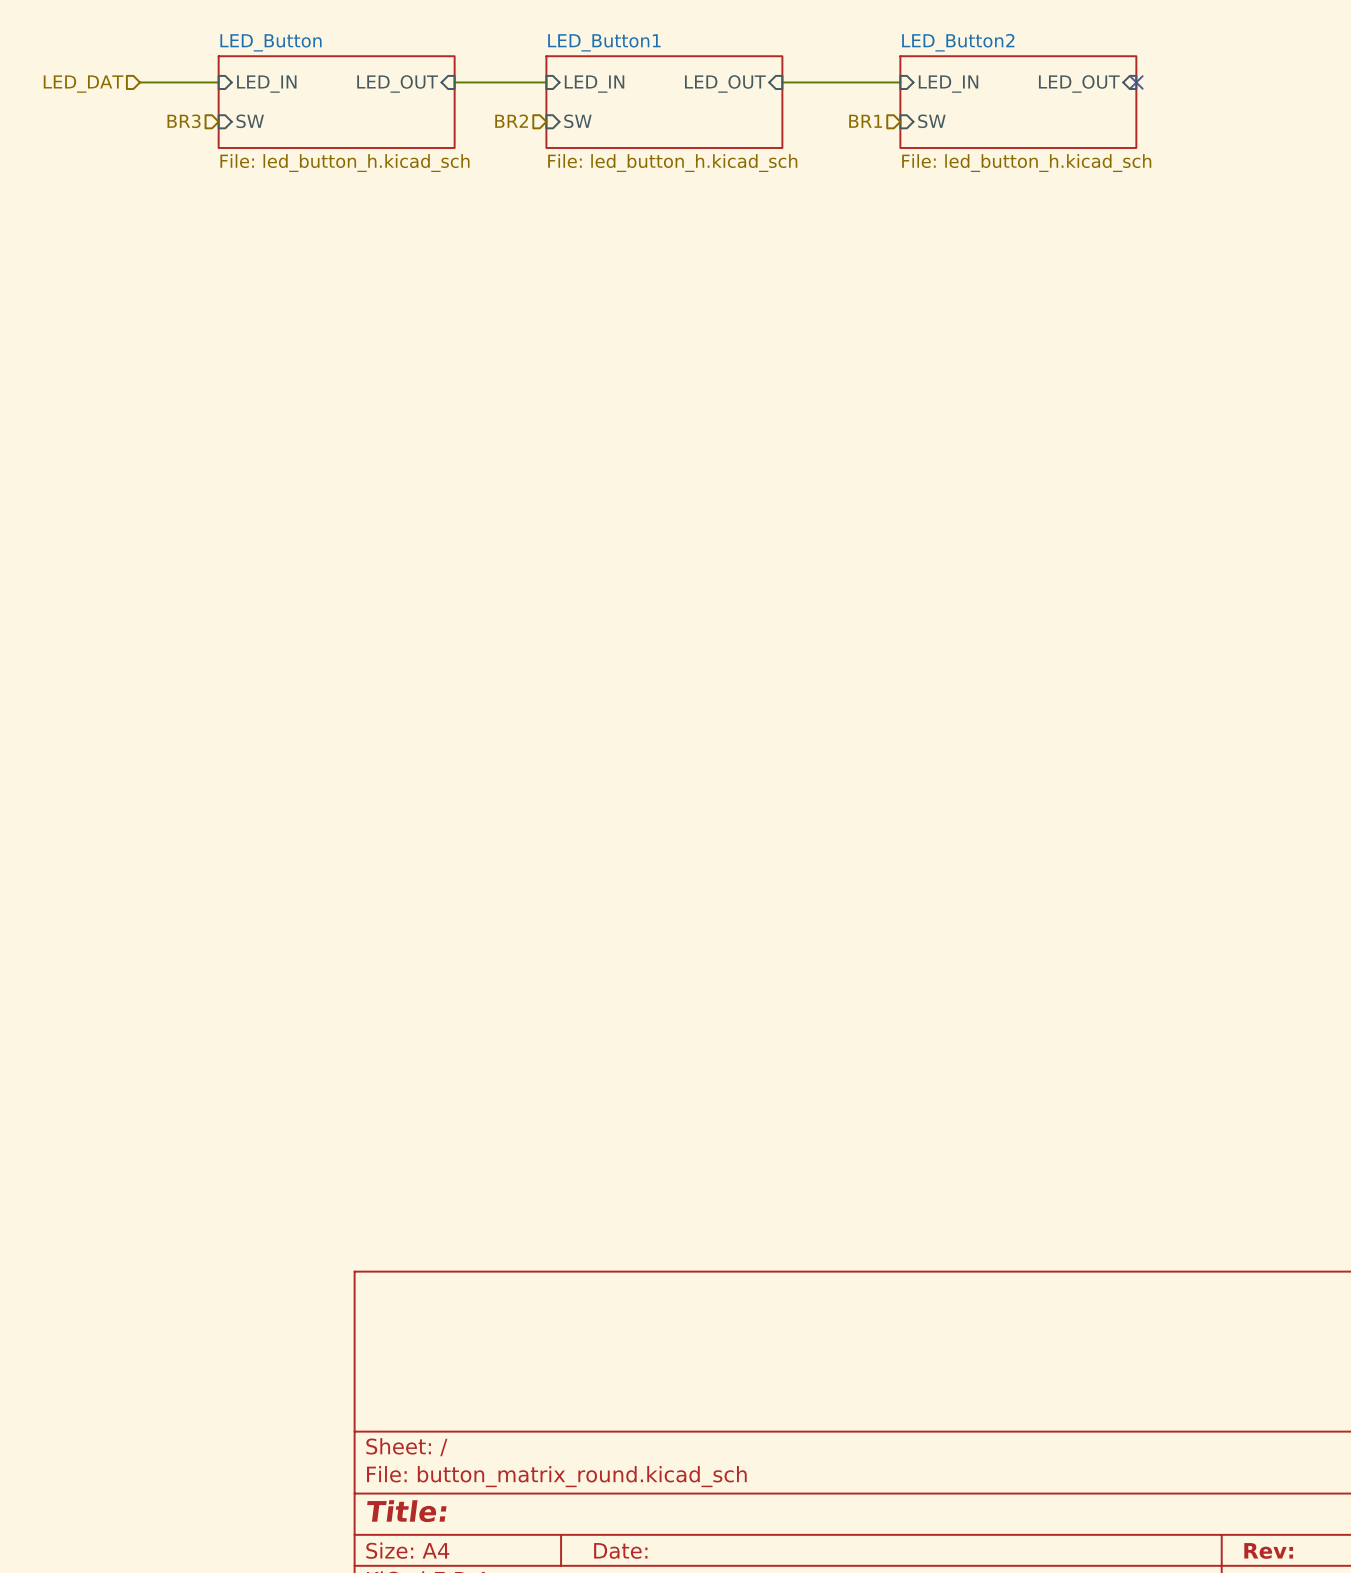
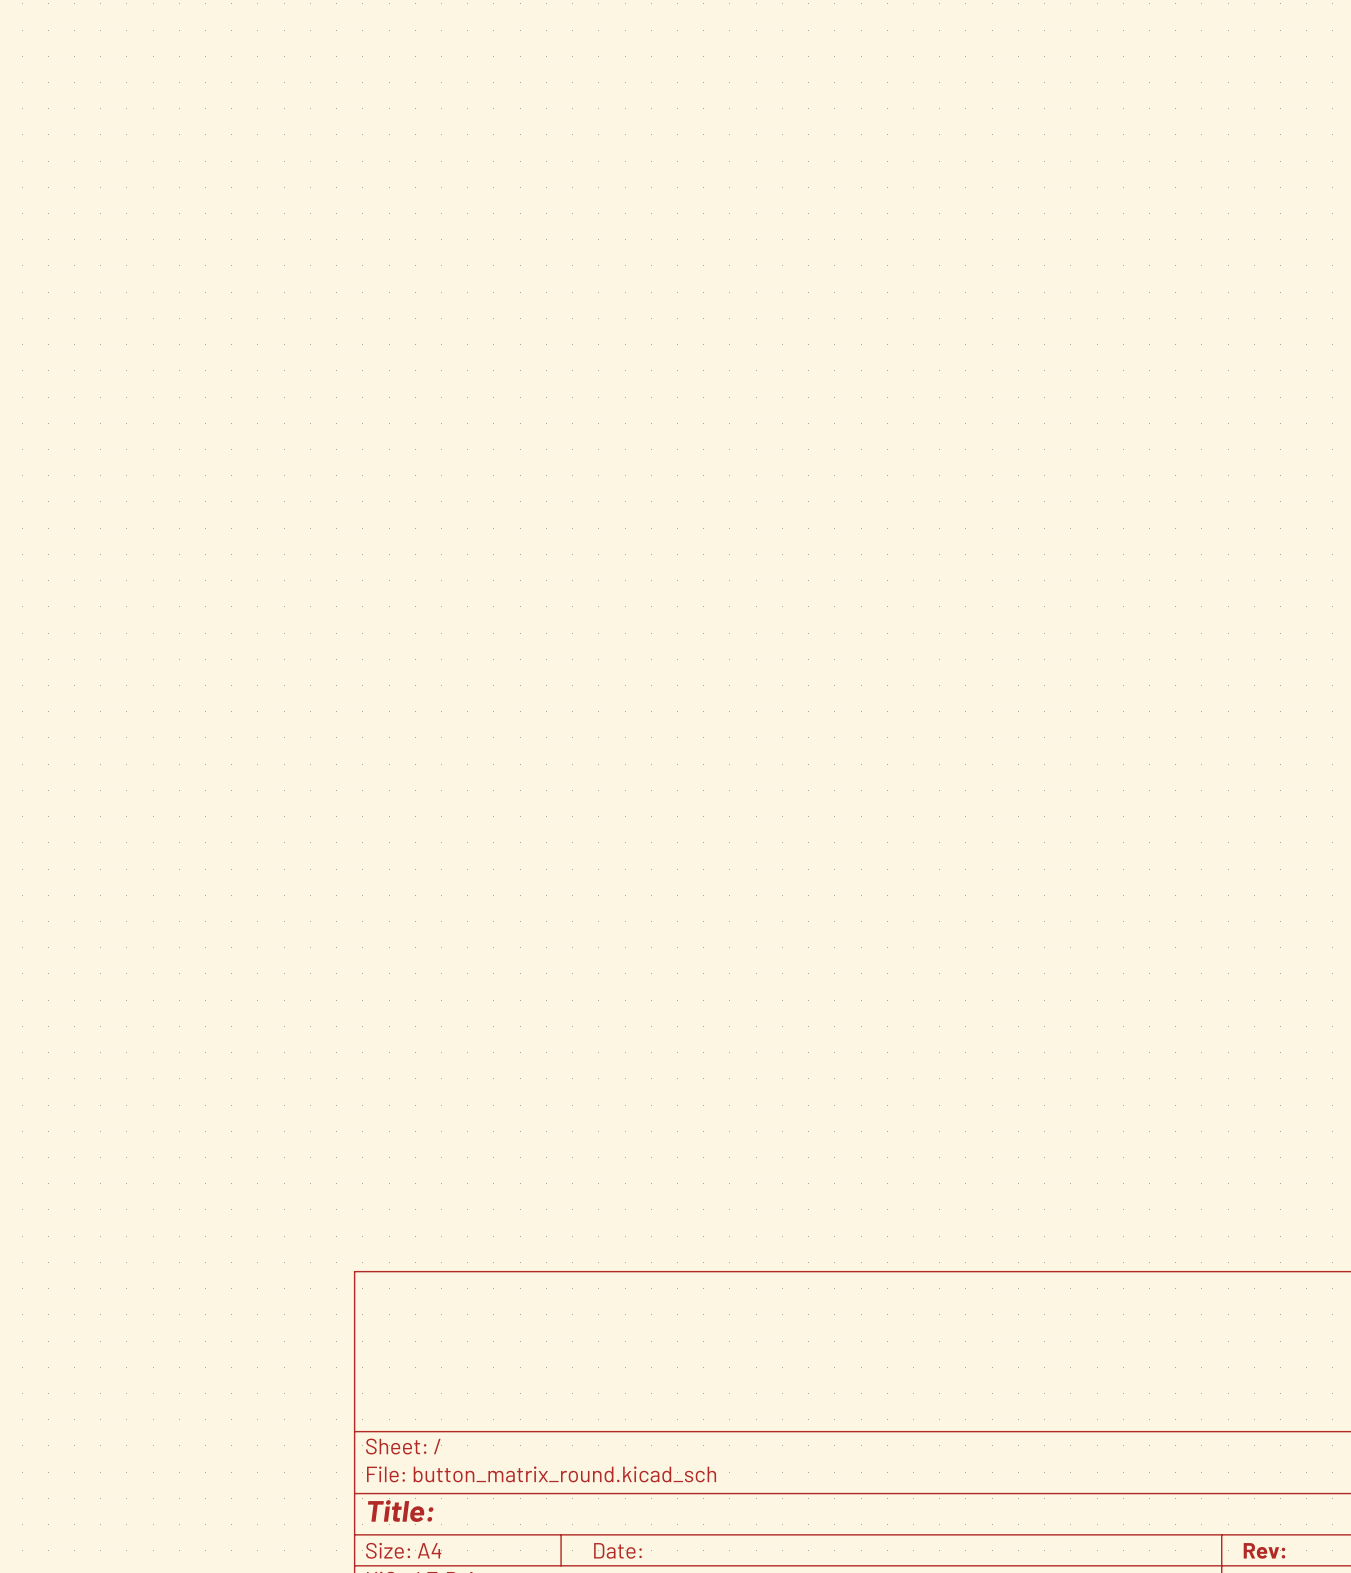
wire: (140, 82) (218, 82) -> none
wire: (454, 82) (546, 82) -> none
wire: (782, 82) (900, 82) -> none
no-connect mark: (1136, 82) -> none
sheet pin: LED_OUT (397, 83) -> none
sheet pin: LED_OUT (725, 83) -> none
sheet pin: LED_OUT (1079, 83) -> none
hierarchical label: LED_DAT (83, 84) -> none
sheet pin: LED_IN (266, 84) -> none
sheet pin: LED_IN (594, 84) -> none
sheet pin: LED_IN (948, 84) -> none
sheet LED_Button: File: led_button_h.kicad_sch (336, 102) -> none
sheet LED_Button1: File: led_button_h.kicad_sch (664, 102) -> none
sheet LED_Button2: File: led_button_h.kicad_sch (1018, 102) -> none
hierarchical label: BR3 (184, 121) -> none
sheet pin: SW (250, 121) -> none
hierarchical label: BR2 (511, 121) -> none
sheet pin: SW (577, 121) -> none
hierarchical label: BR1 (865, 121) -> none
sheet pin: SW (931, 121) -> none

